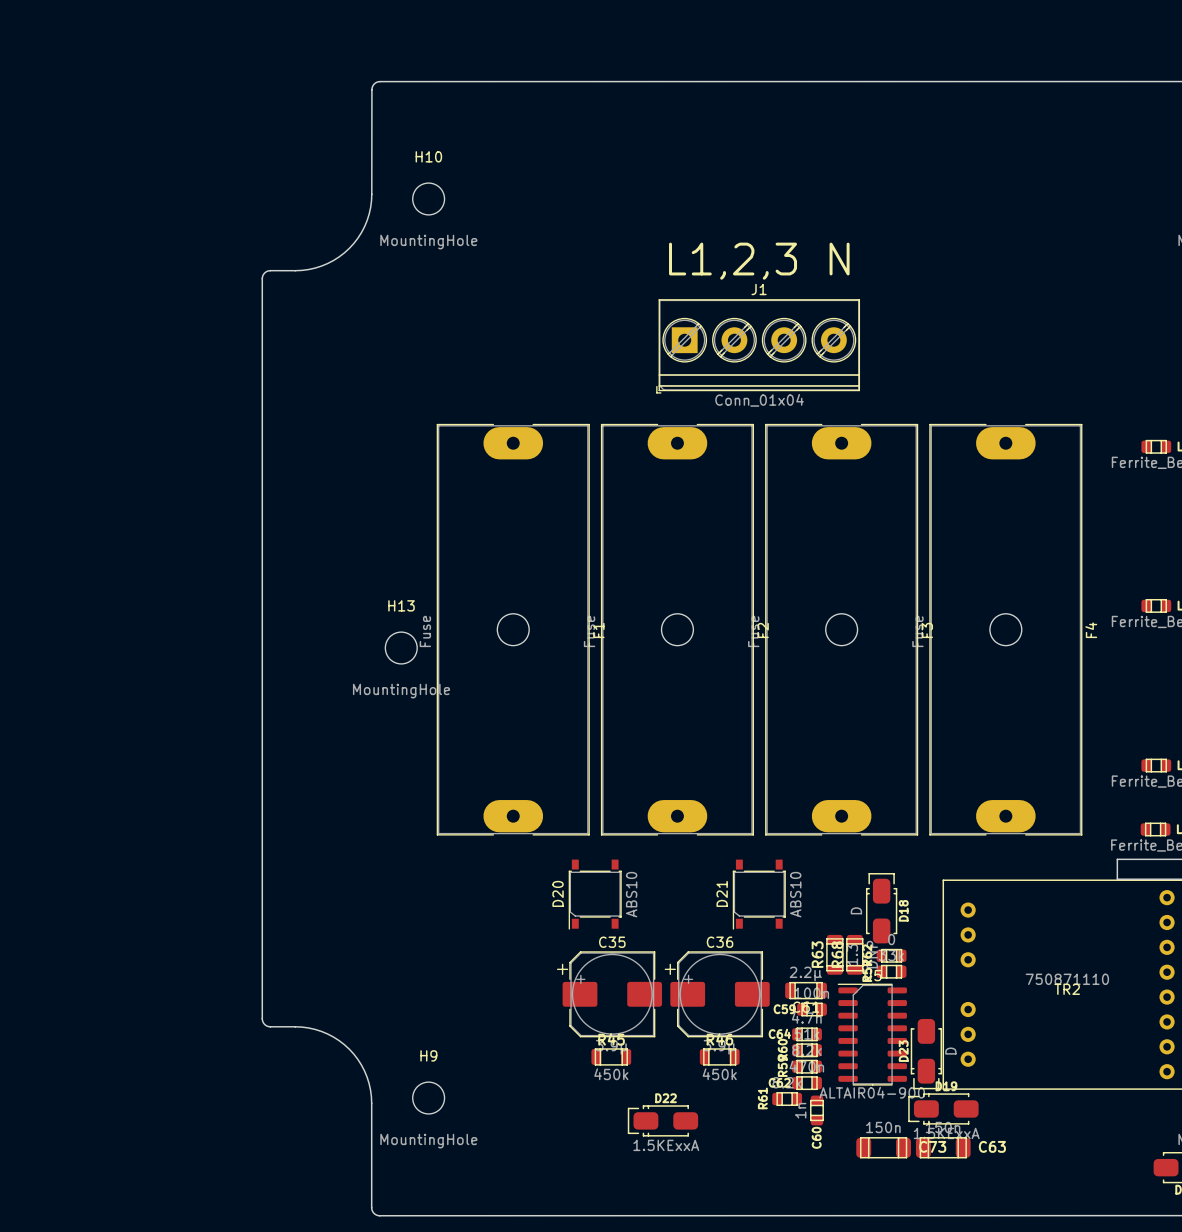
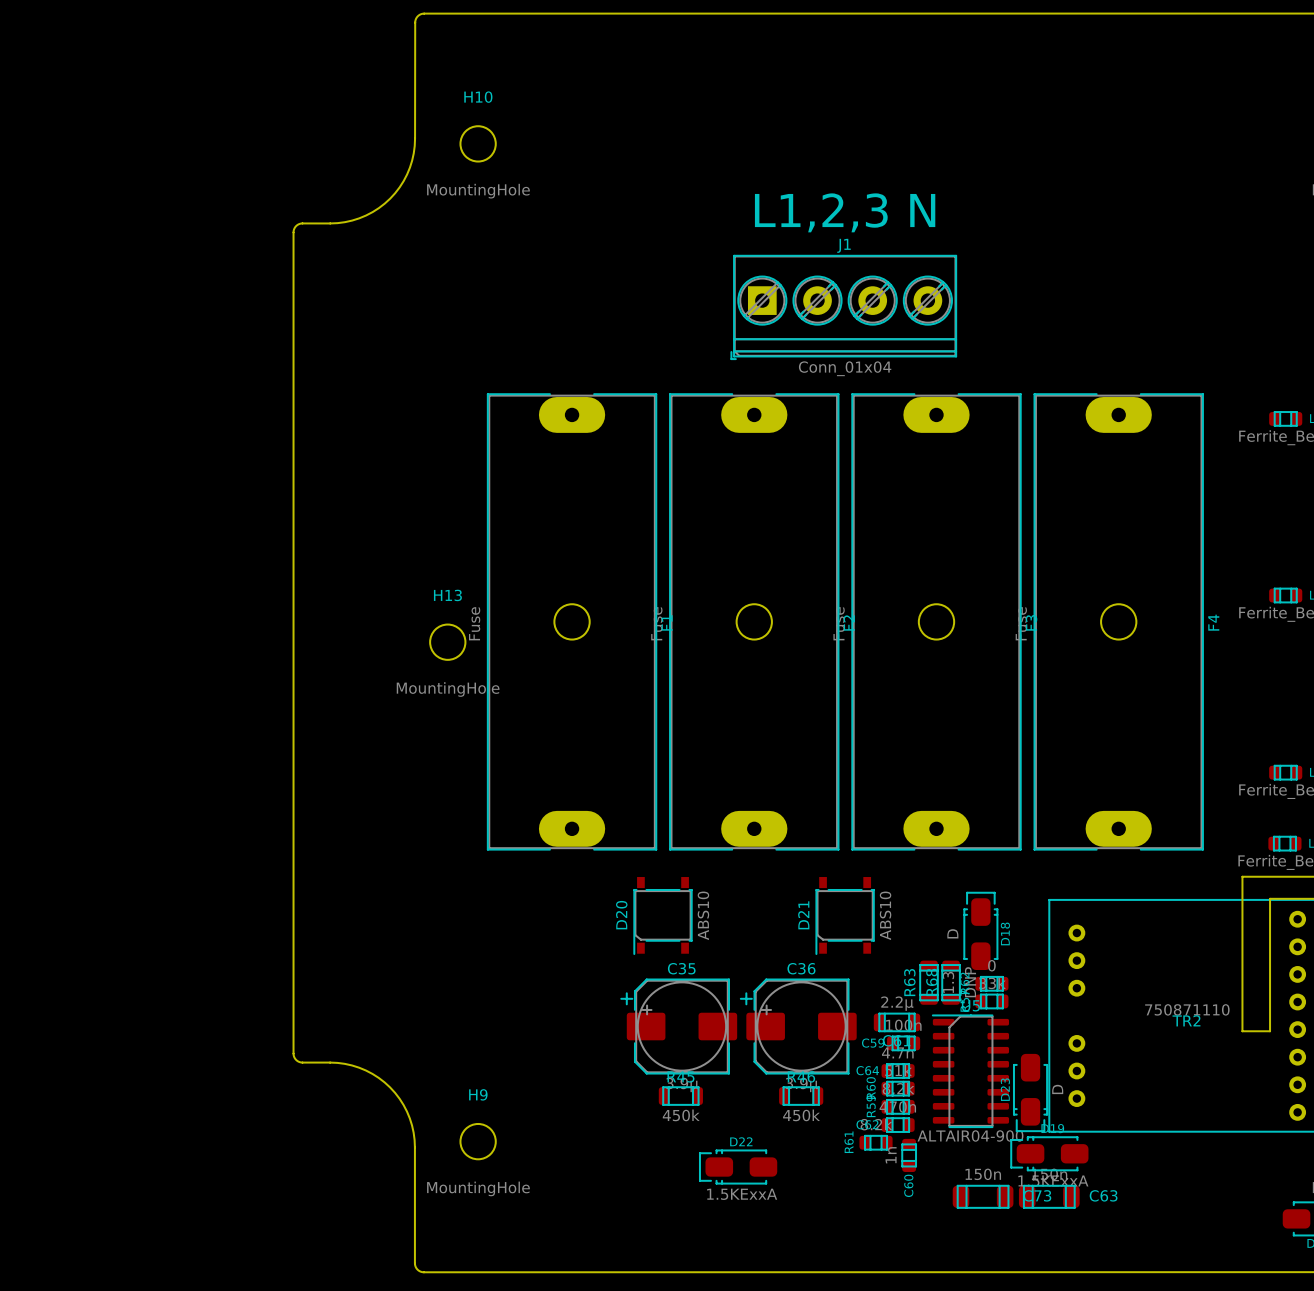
board edge: (1117, 879) (1142, 879) -> (1242, 898) (1242, 1031) (1270, 1031) (1270, 898)

